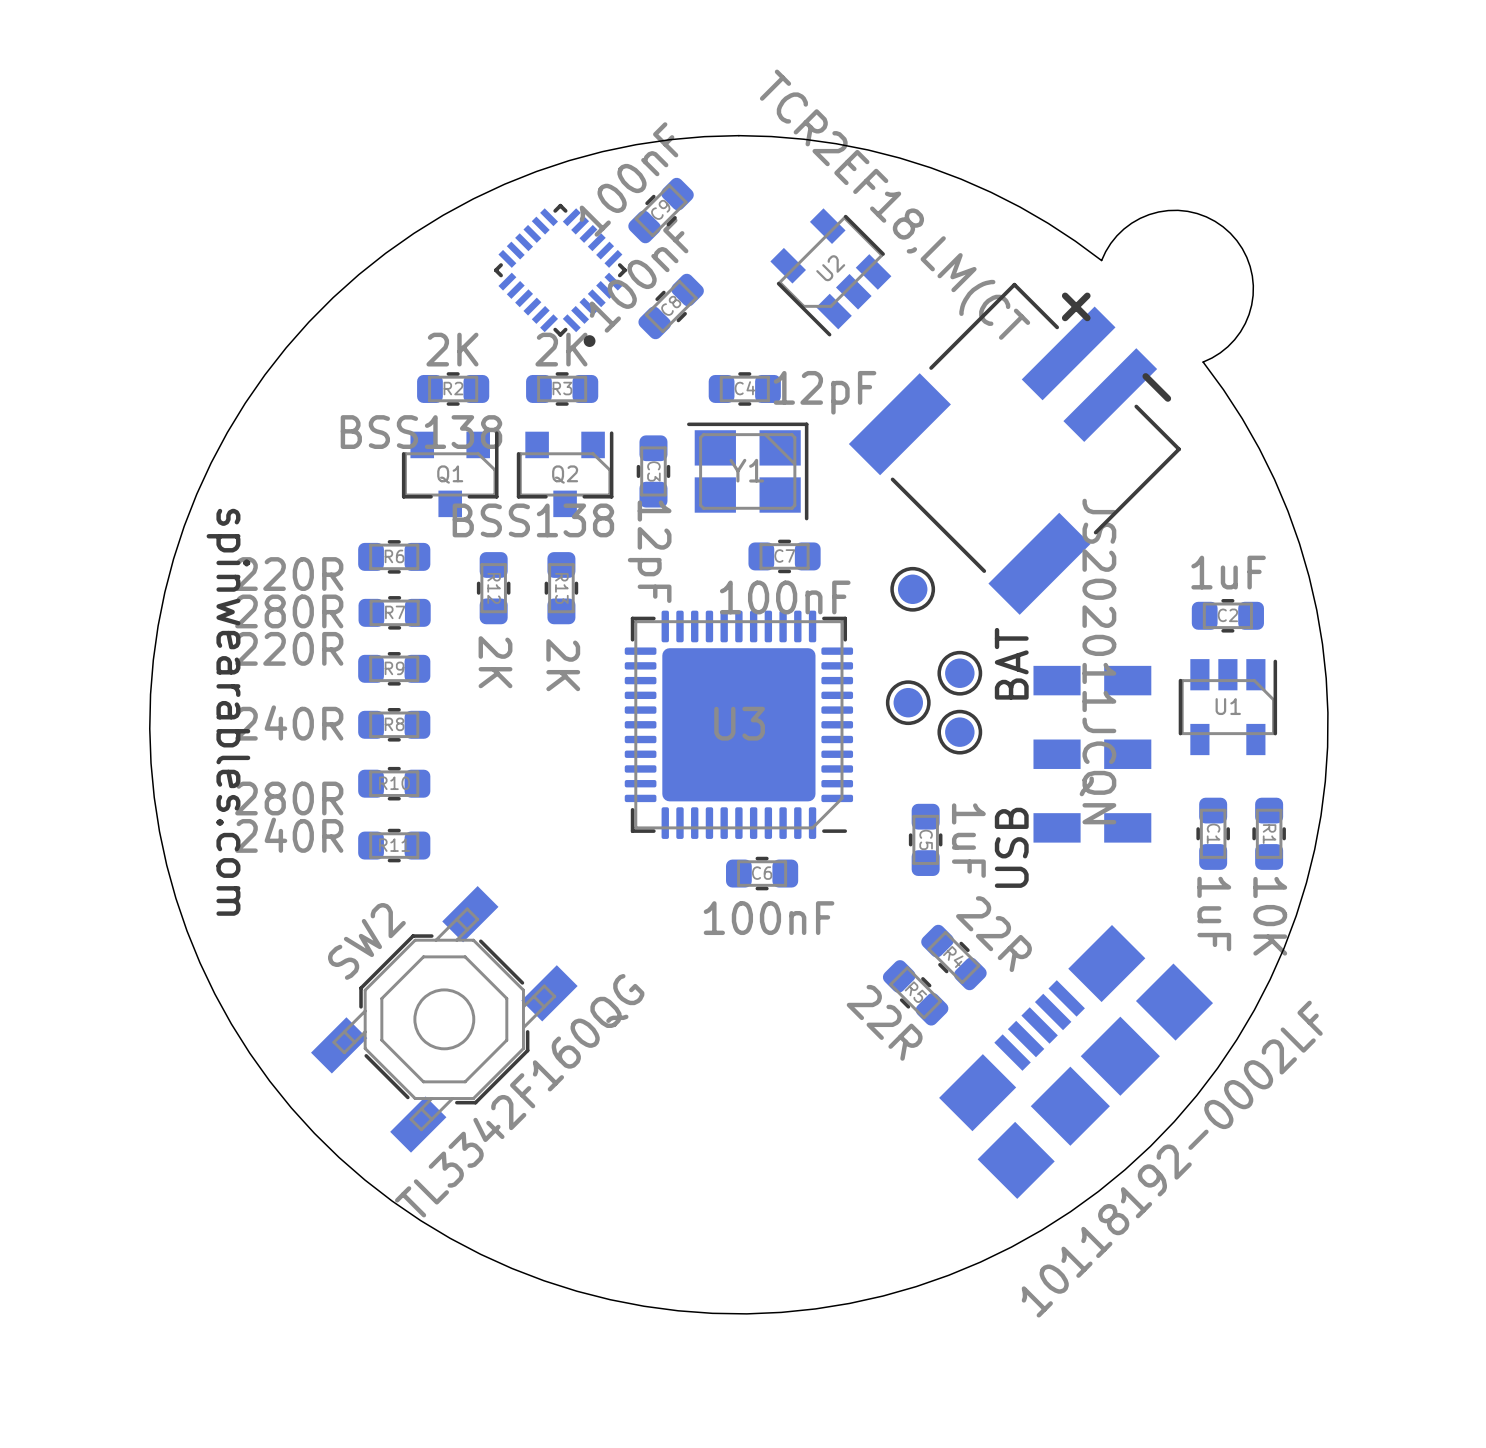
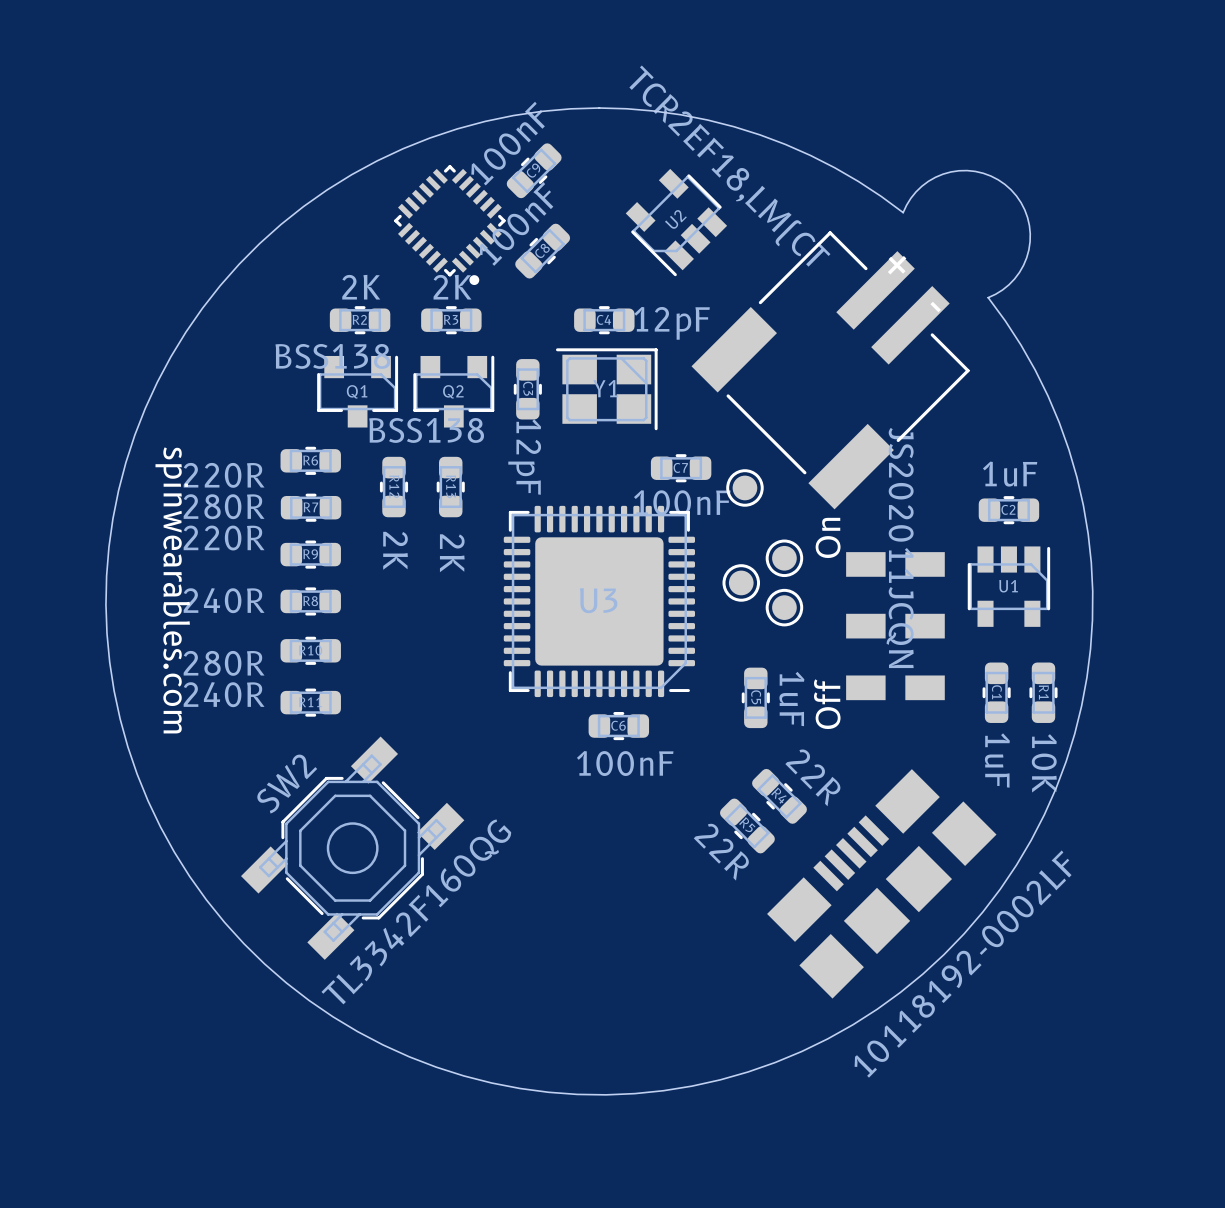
C7 position: (784, 556) -> (681, 468)
text: BAT (1011, 663) -> On (828, 537)
text: USB (1011, 847) -> Off (827, 704)

